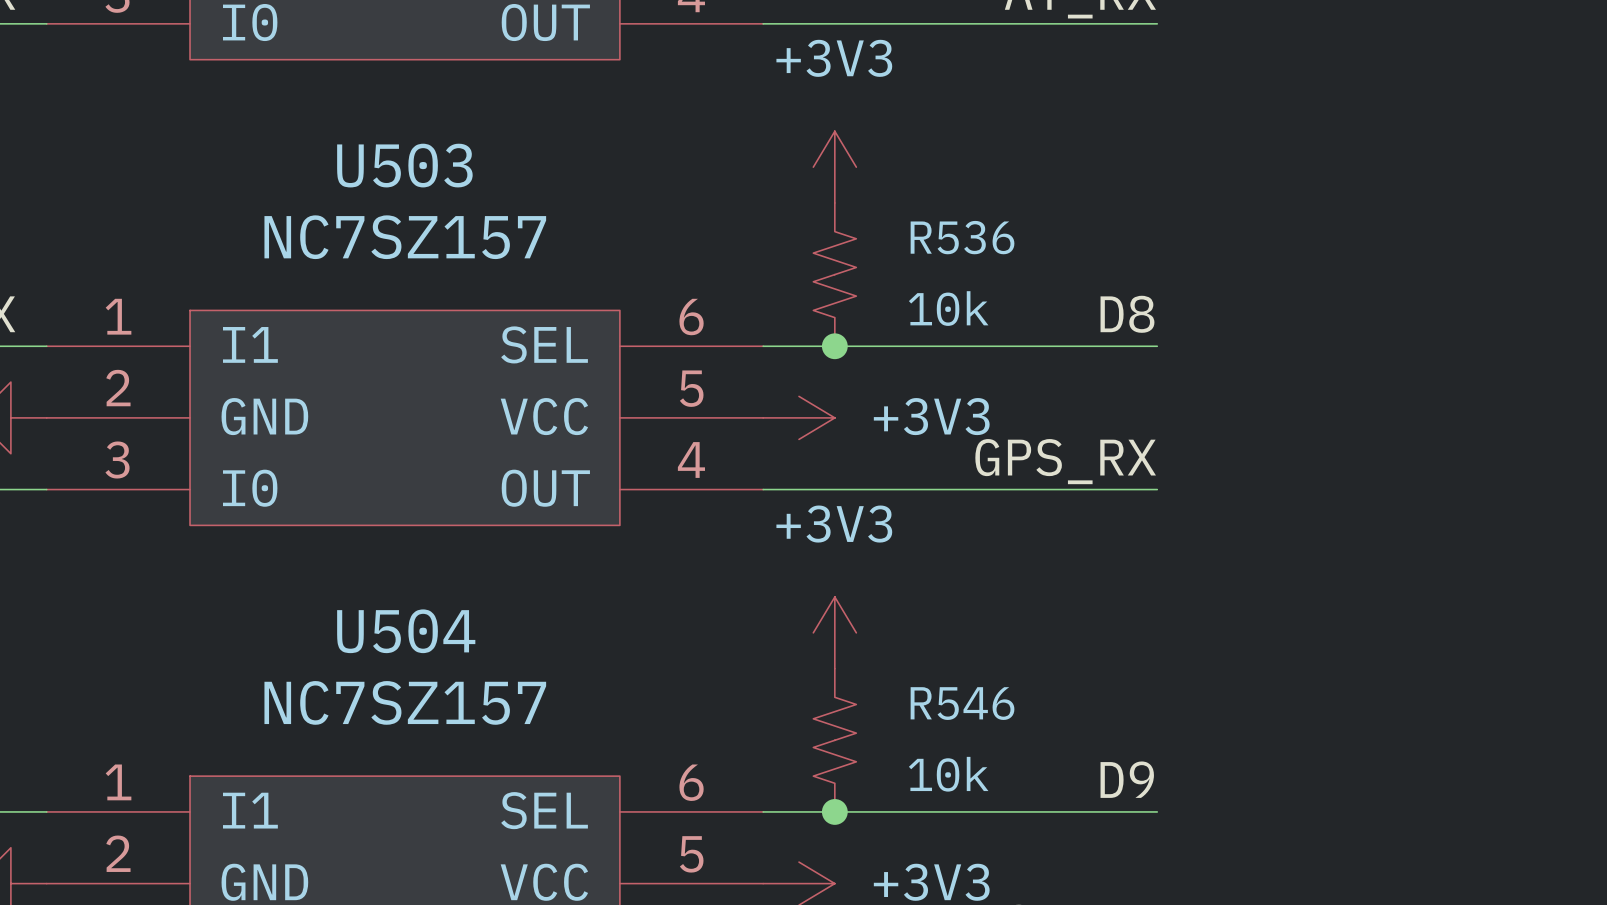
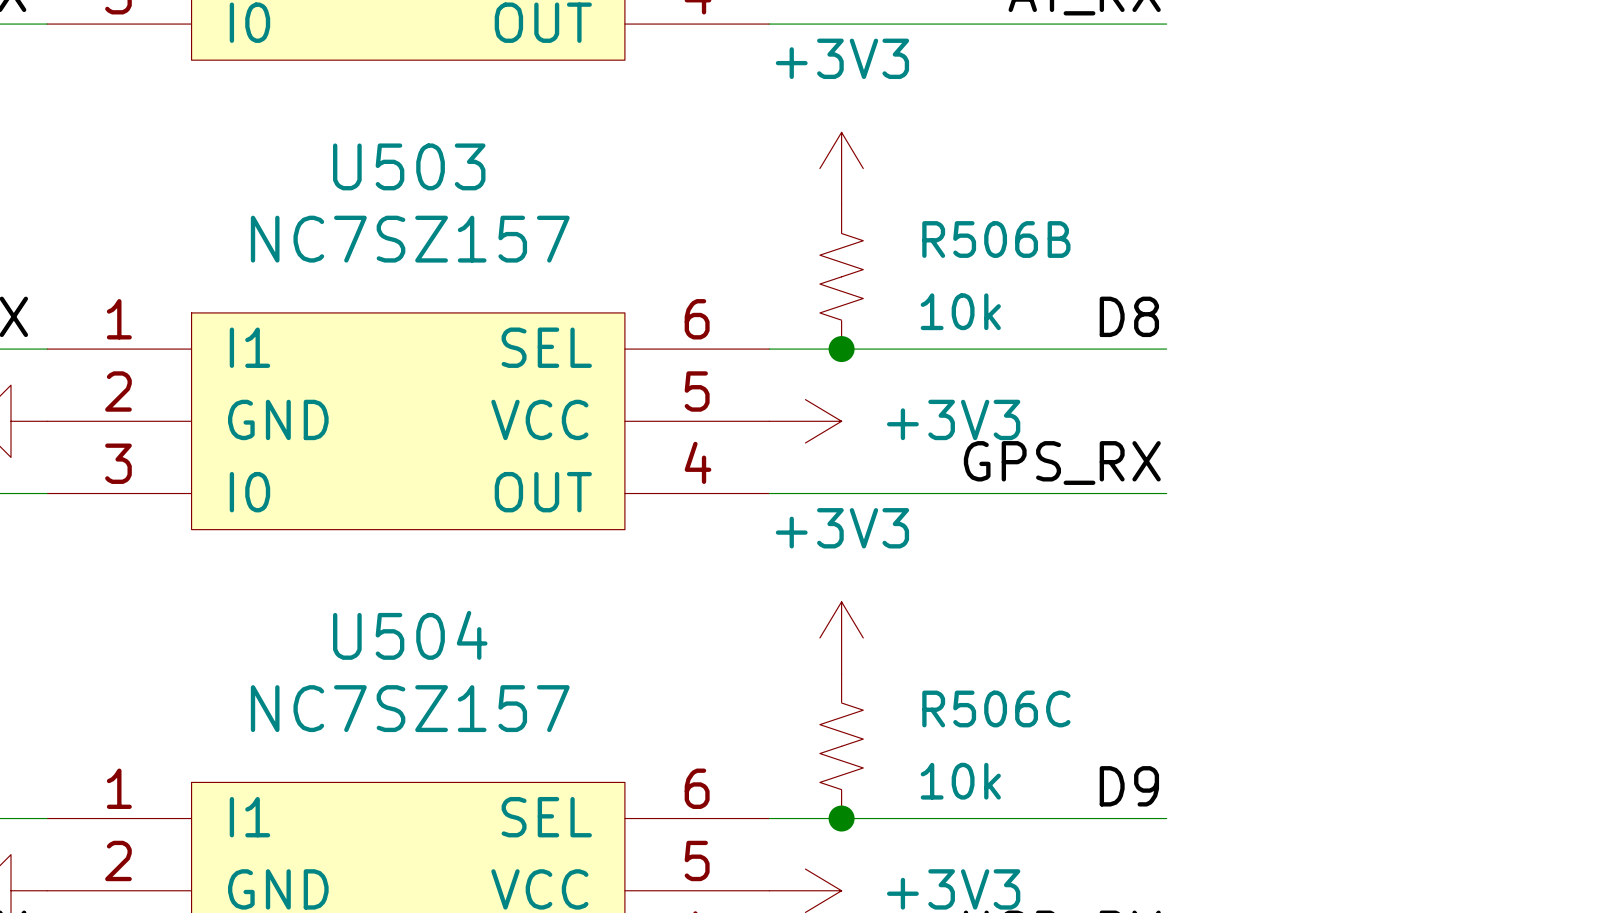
R536 name: R536 (962, 237) -> R506B (996, 239)
R546 name: R546 (962, 703) -> R506C (996, 708)

